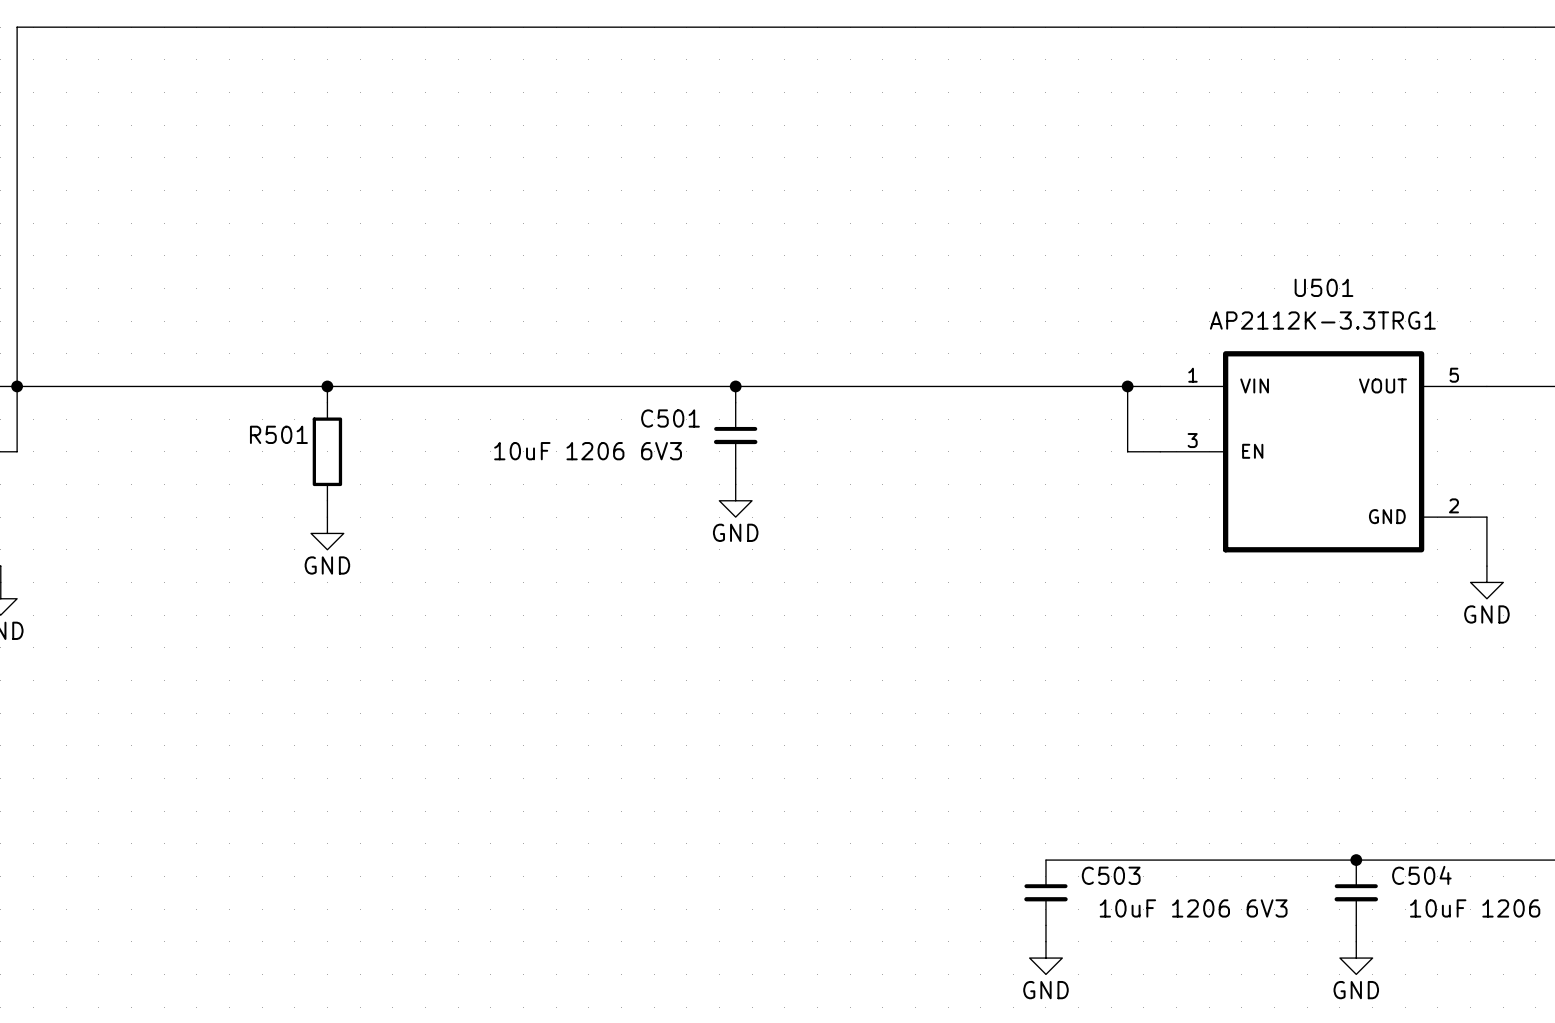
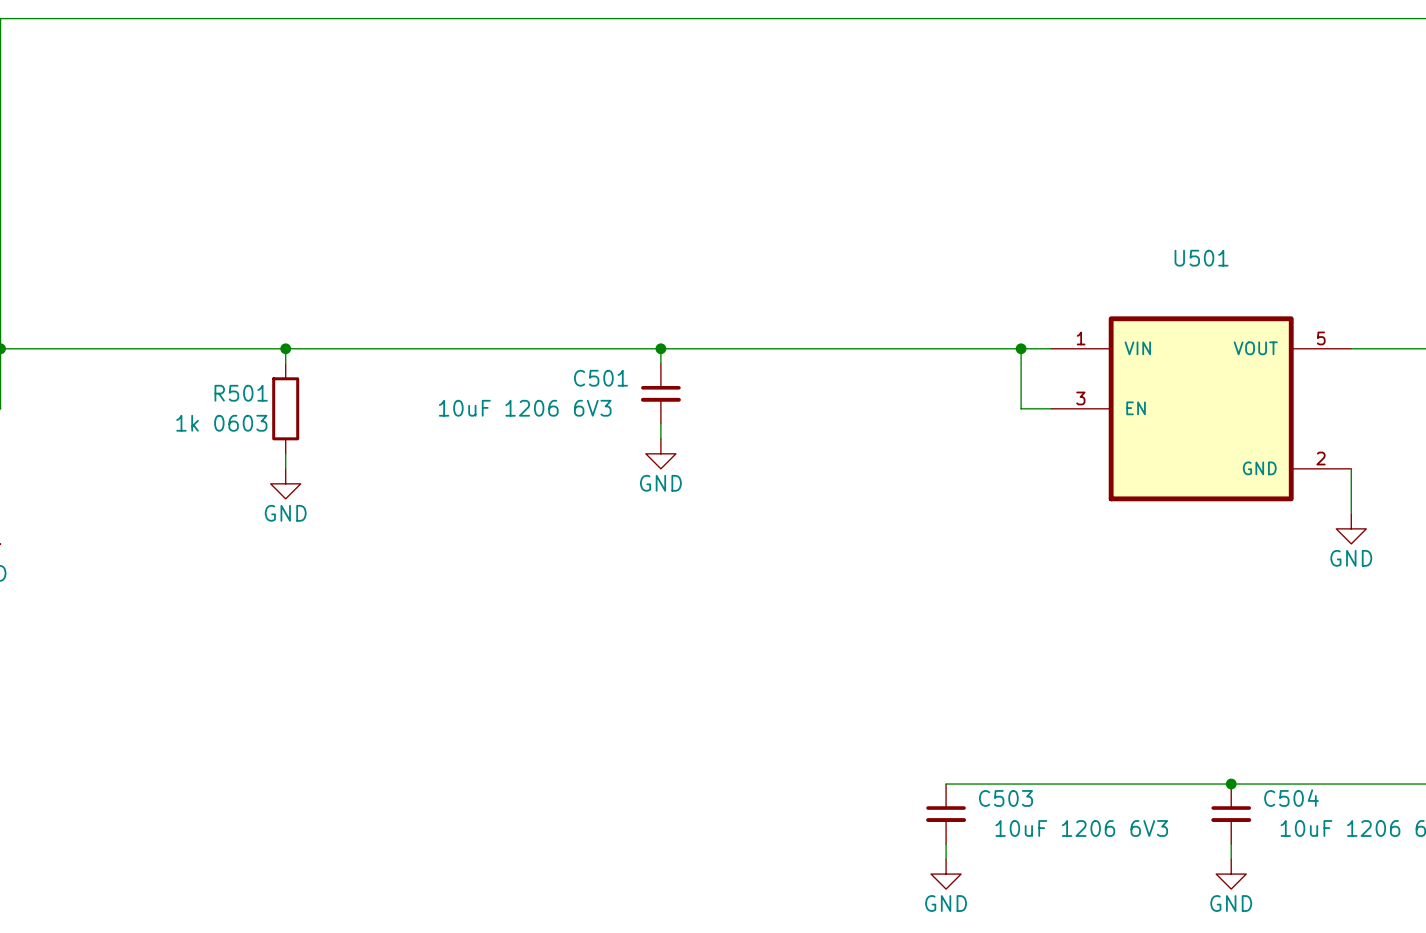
U501 value: AP2112K-3.3TRG1 (1322, 320) -> none
R501 value: none -> 1k 0603 (221, 423)

